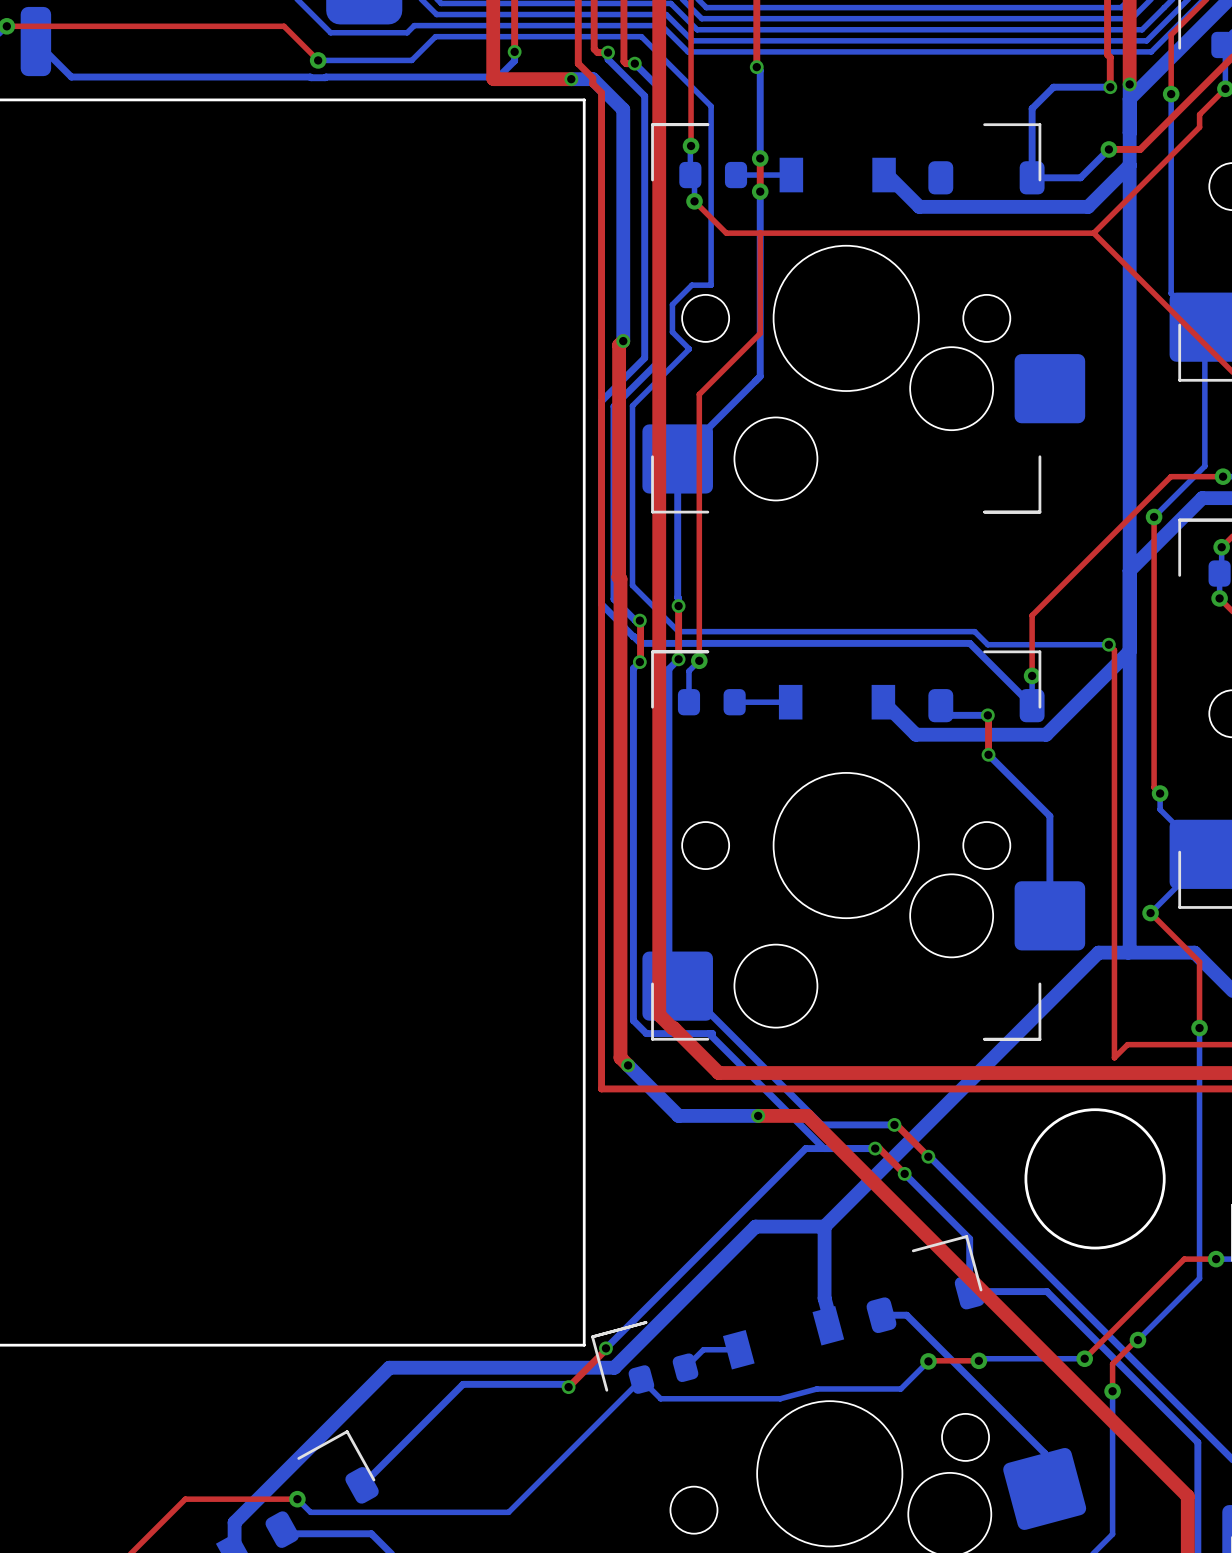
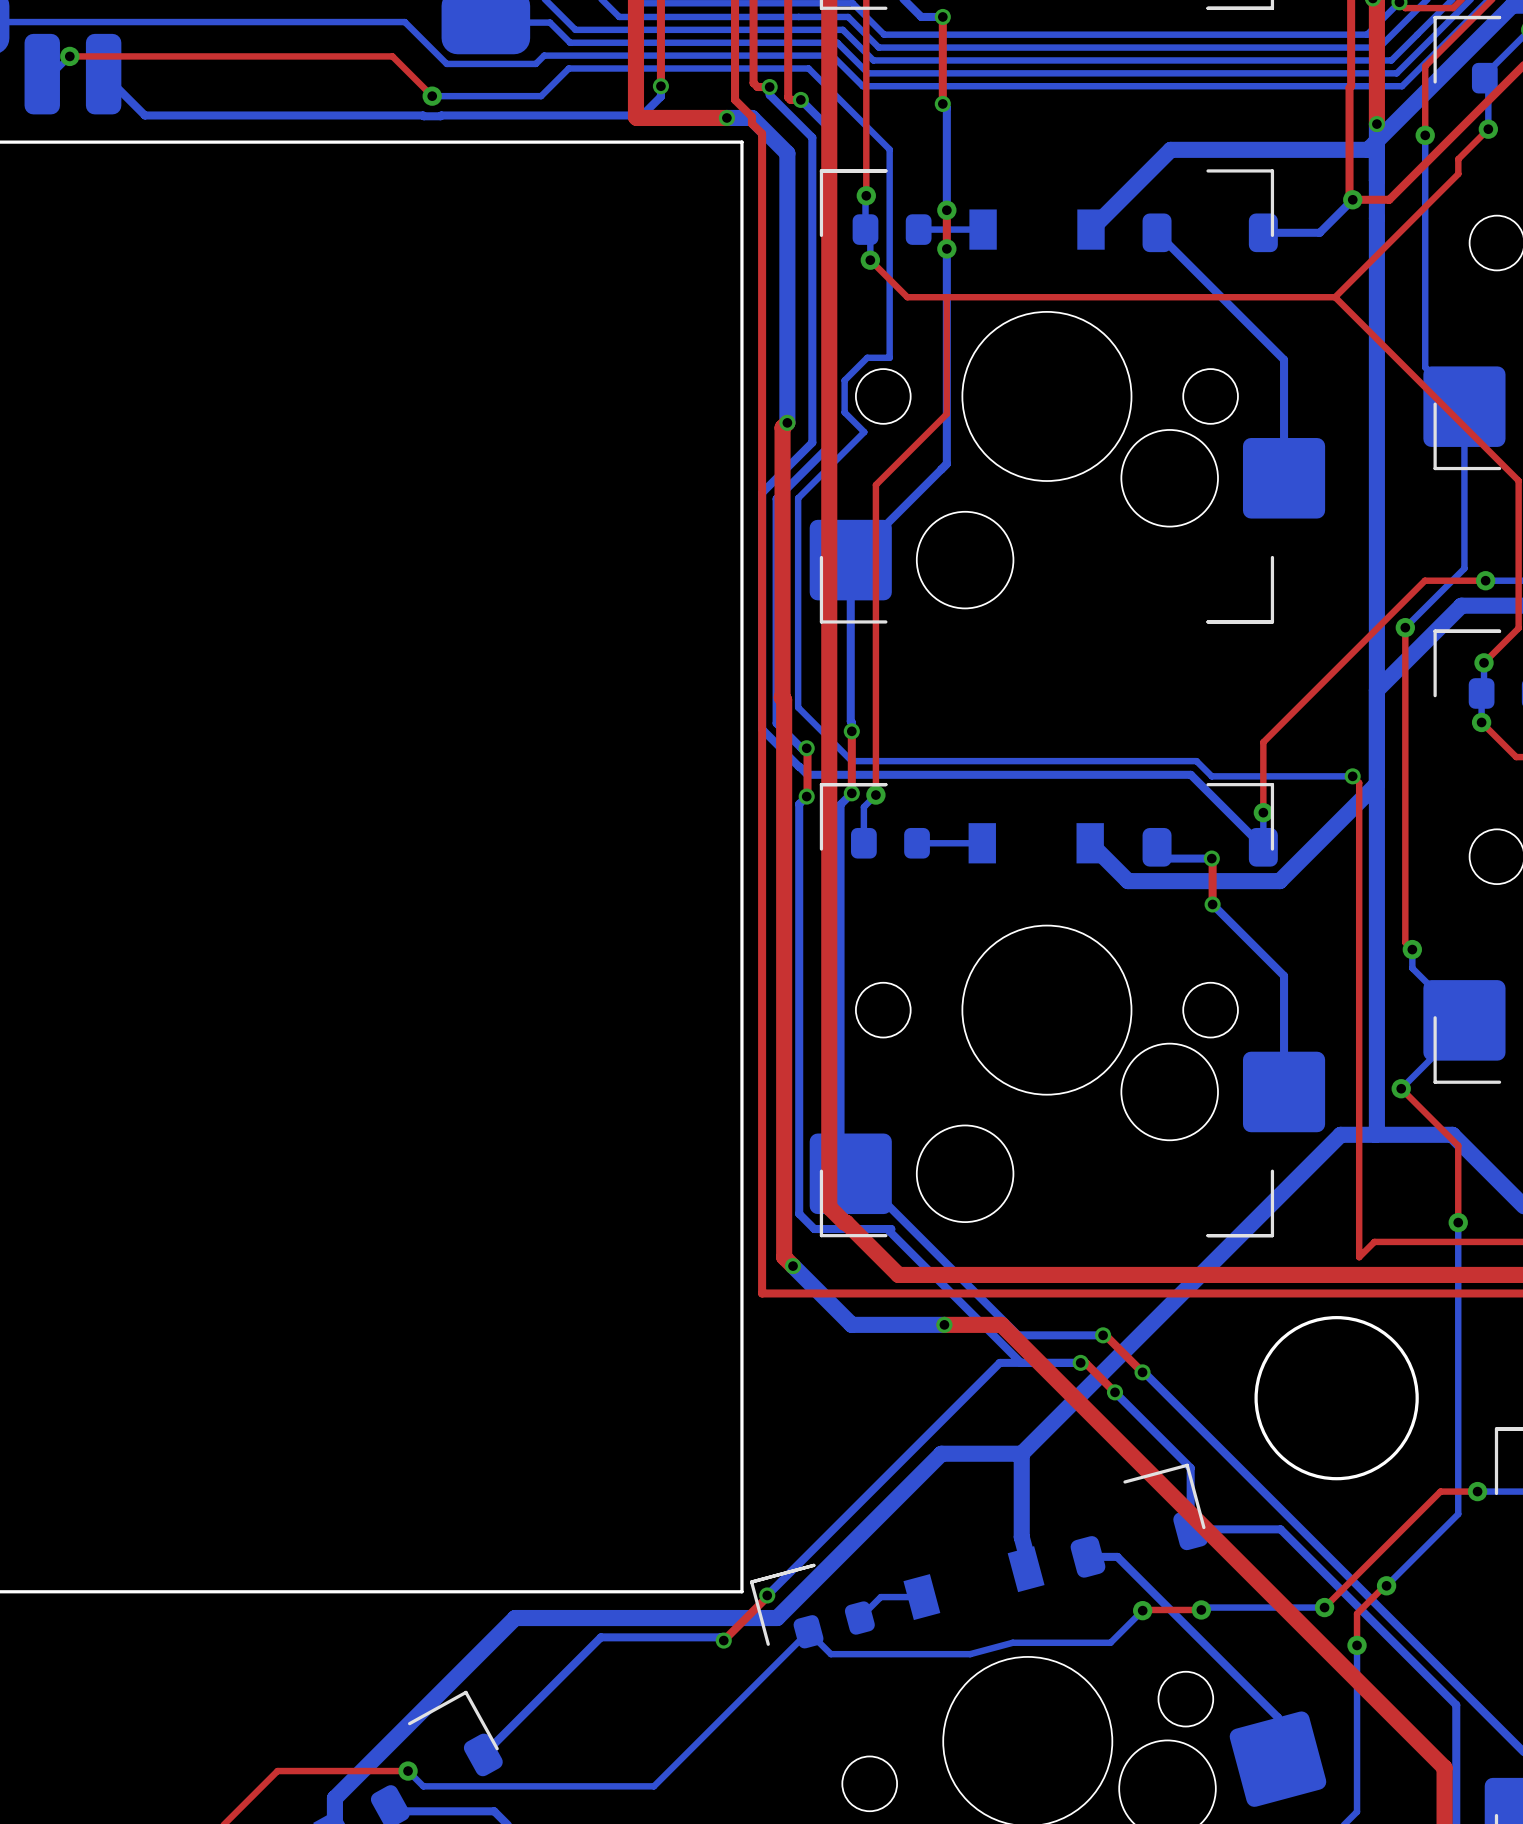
top track: (1107, 51) (1110, 57) (1110, 87) -> (1351, 86) (1349, 87) (1349, 196) (1352, 199)
bottom track: (1110, 87) (1053, 87) (1032, 108) (1032, 177) -> none
via: (1110, 87) -> none
bottom track: none -> (1376, 140) (1368, 149) (1170, 149) (1091, 229)
bottom track: (1129, 165) (1088, 206) (919, 206) (887, 175) -> none
bottom track: none -> (1157, 232) (1284, 359) (1284, 478)

